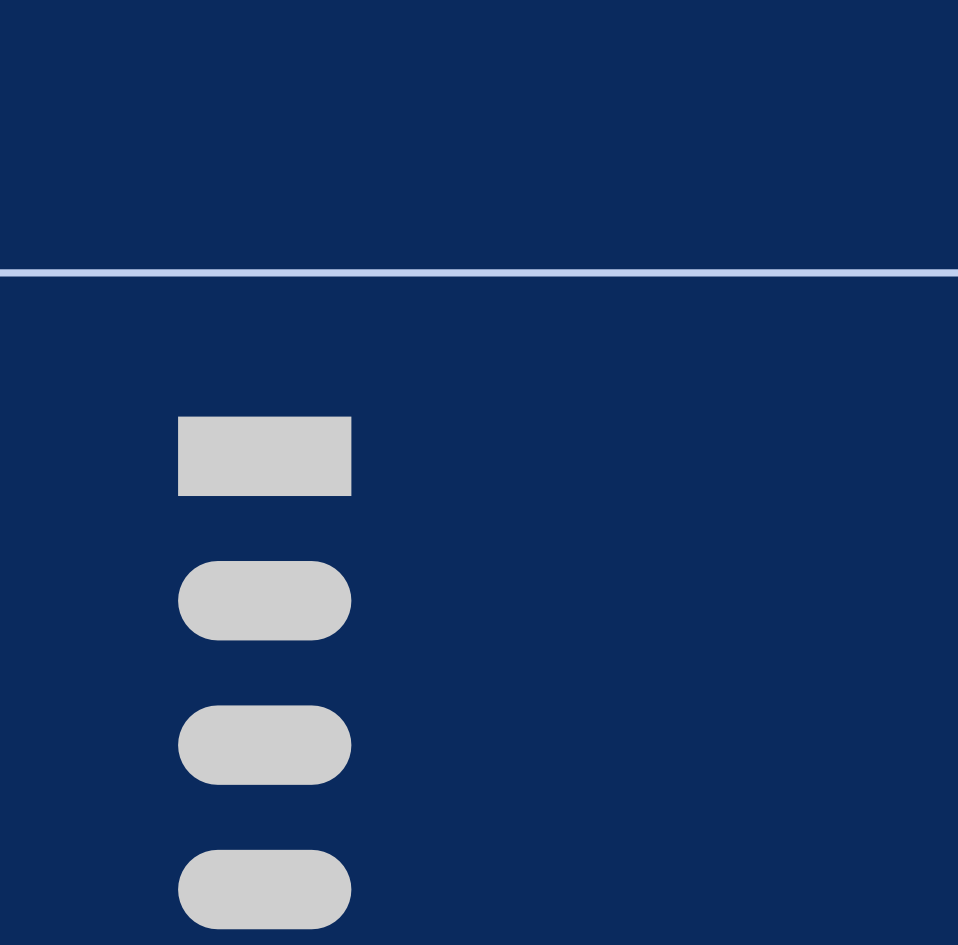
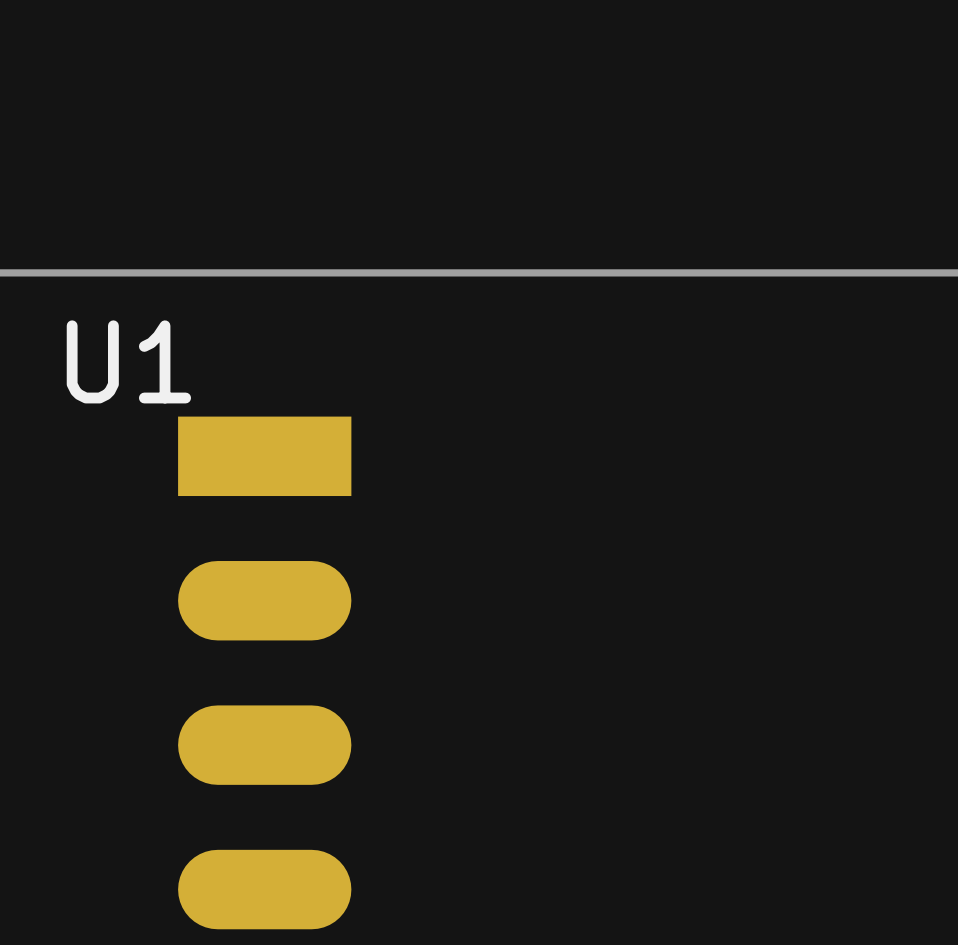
U1 name: none -> U1 (128, 361)

